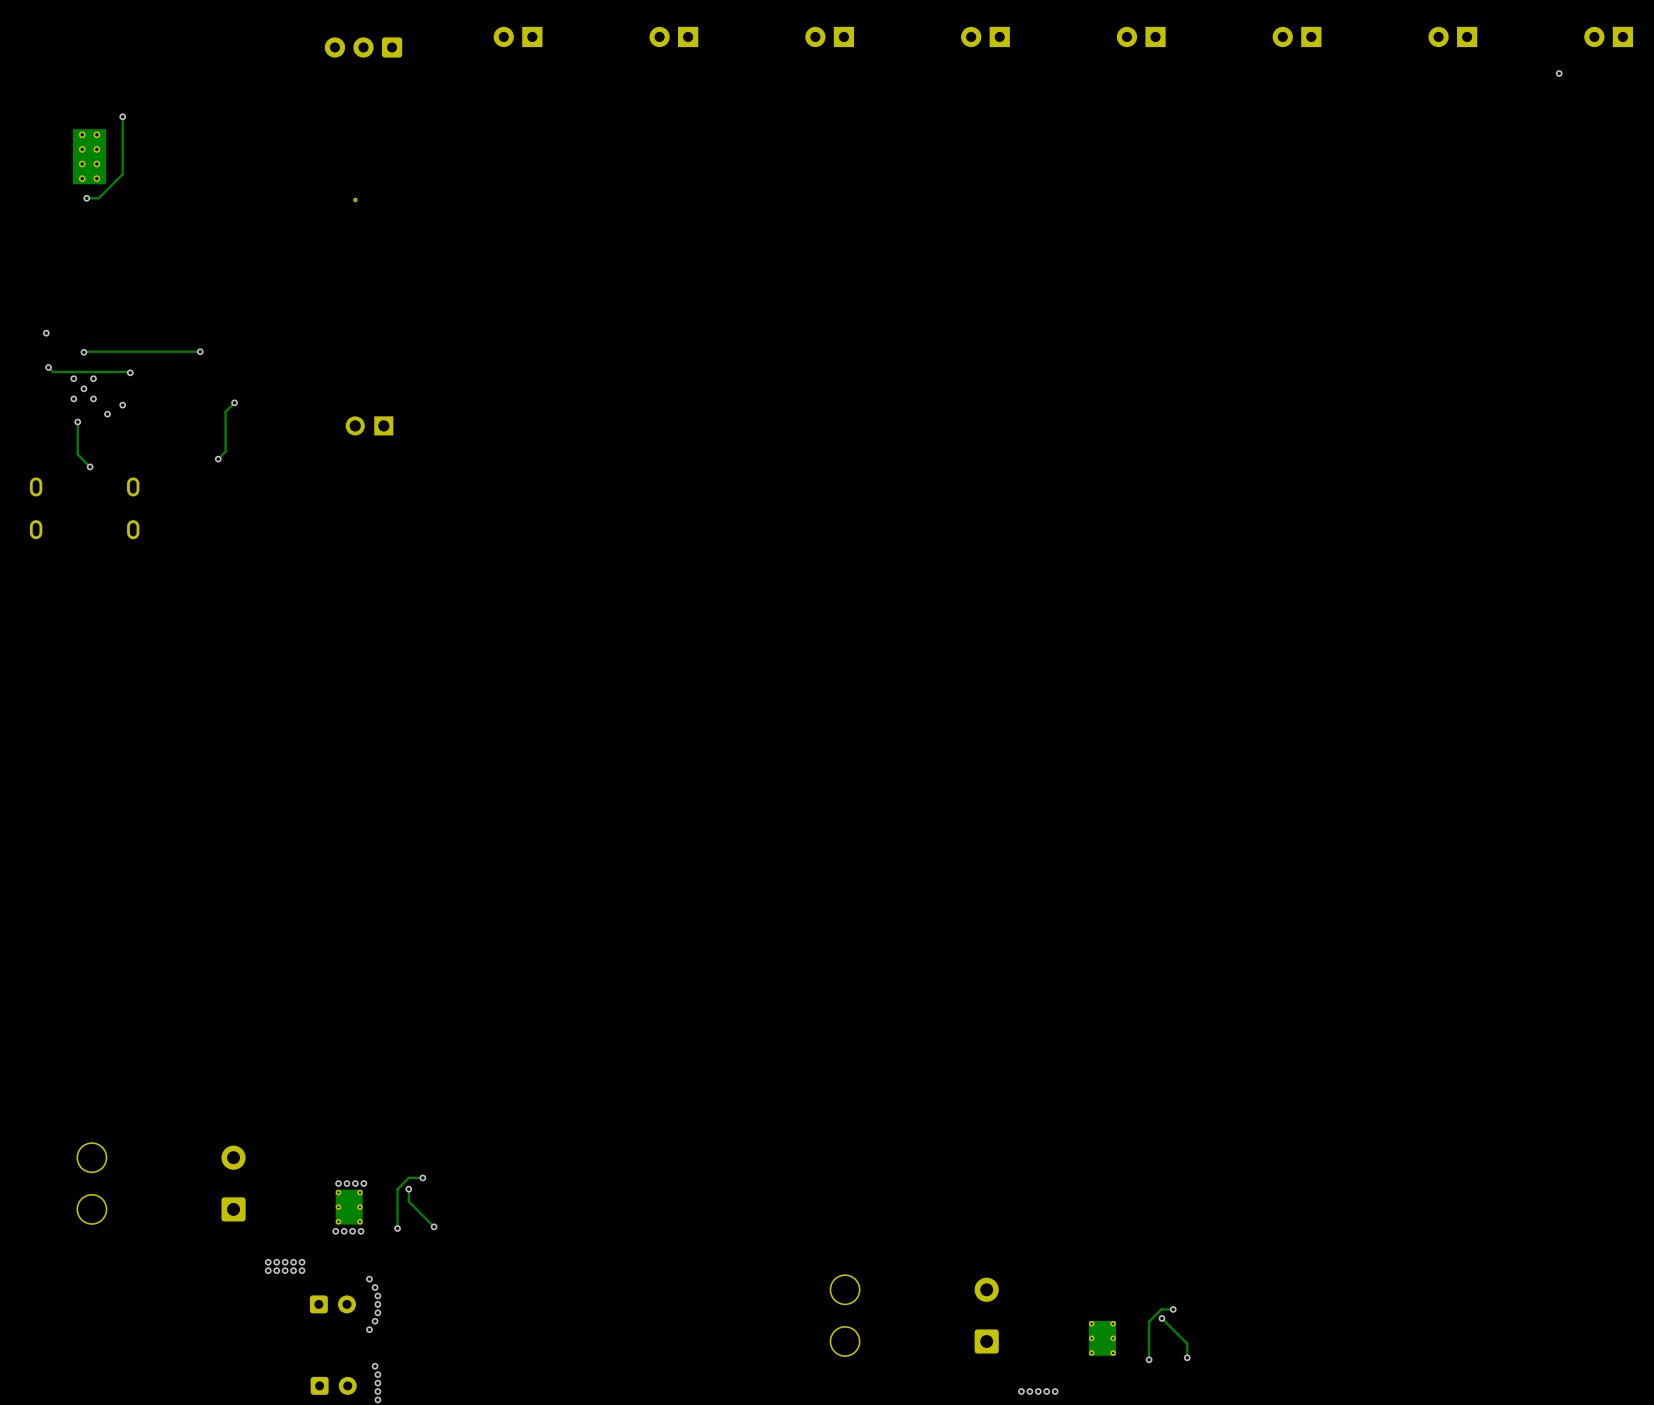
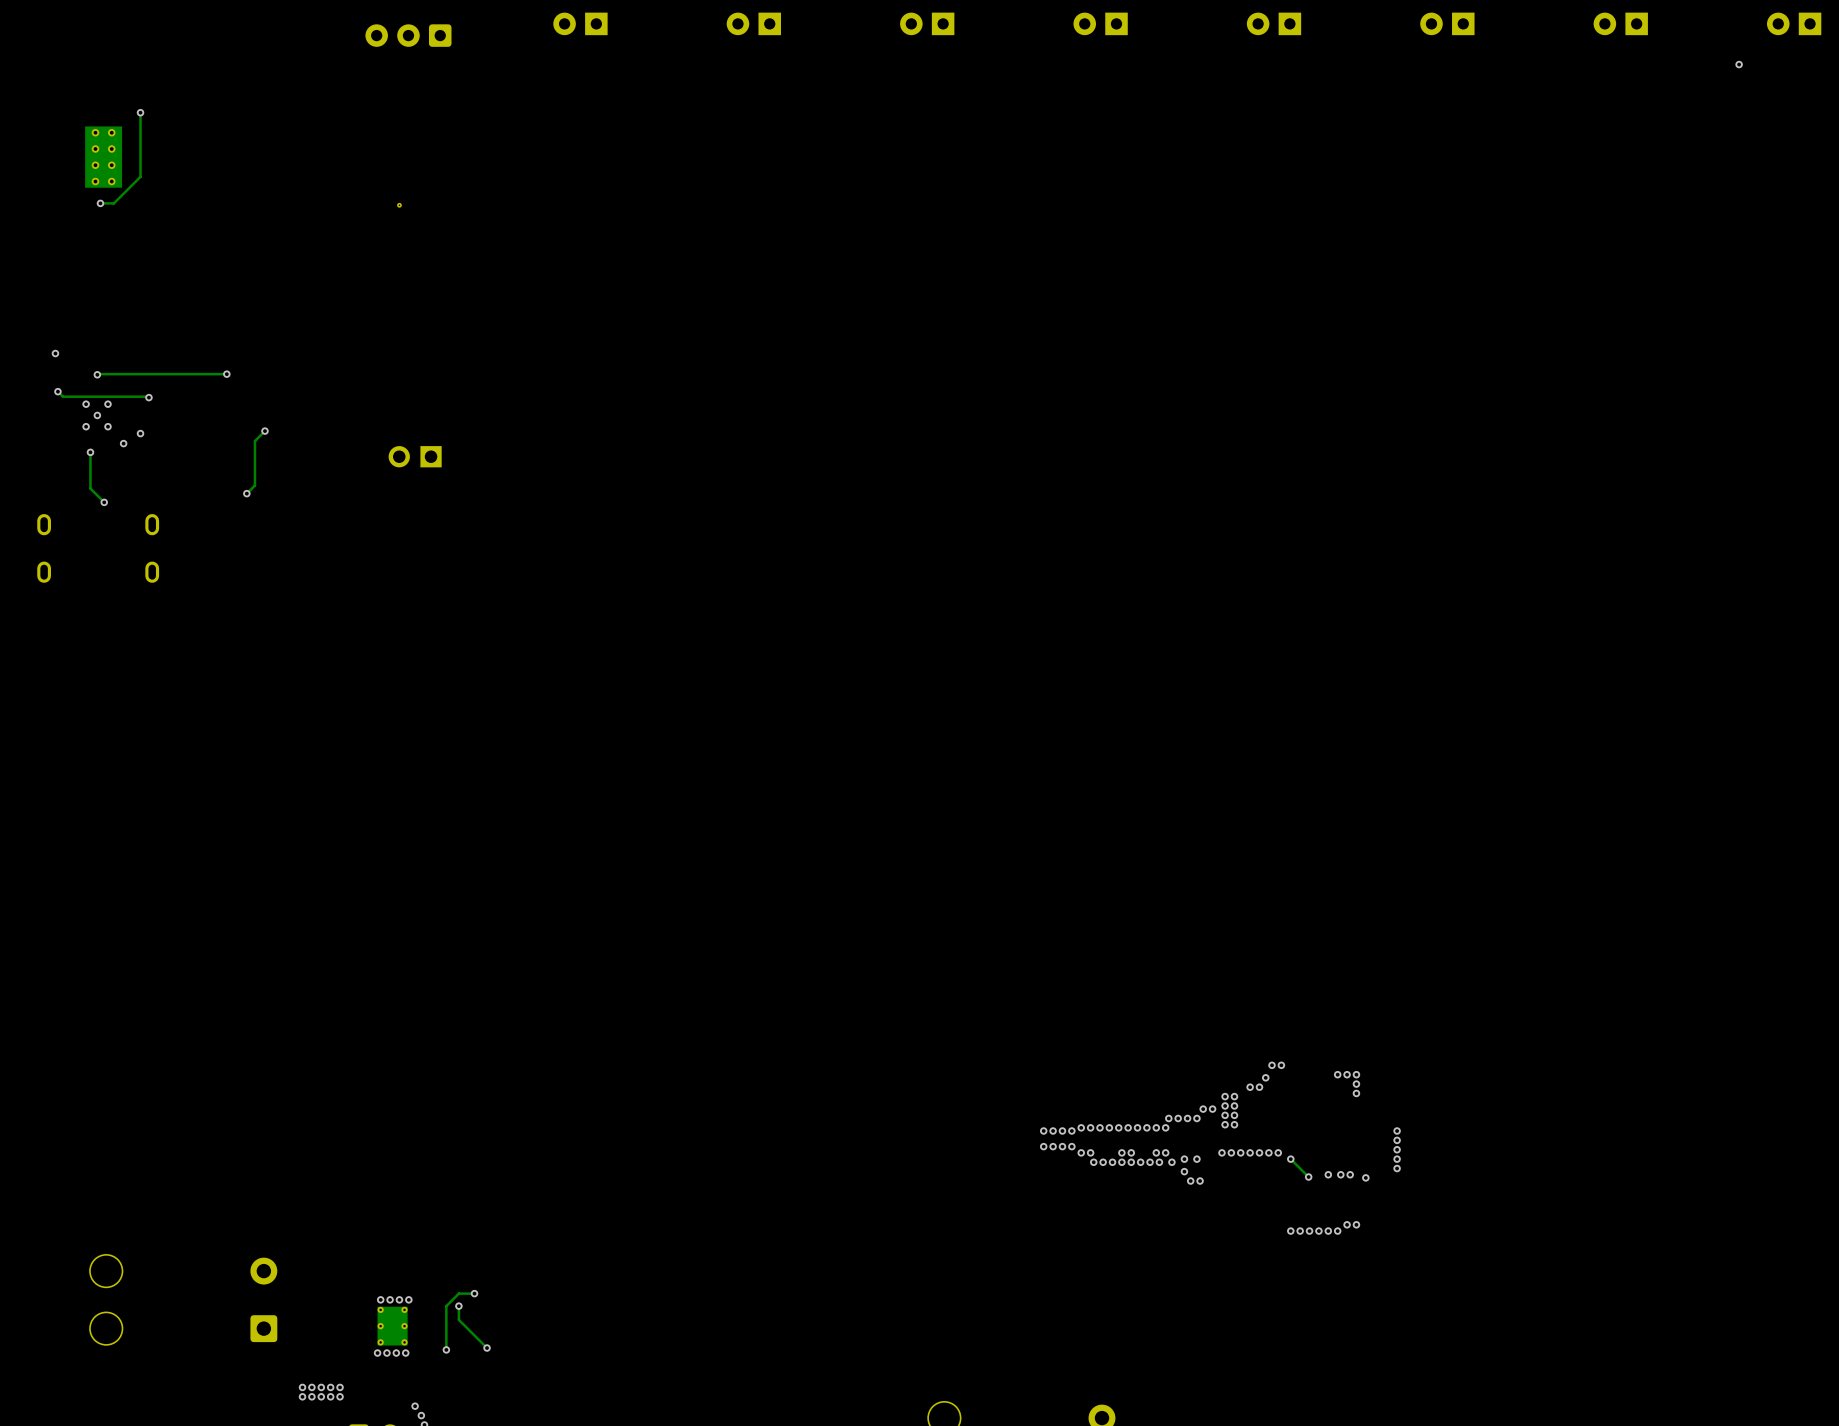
via: none -> (1272, 1065)
via: none -> (1281, 1065)
via: none -> (1337, 1074)
via: none -> (1347, 1074)
via: none -> (1356, 1074)
via: none -> (1265, 1077)
via: none -> (1356, 1084)
via: none -> (1250, 1087)
via: none -> (1259, 1087)
via: none -> (1356, 1093)
via: none -> (1225, 1096)
via: none -> (1234, 1096)
via: none -> (1225, 1105)
via: none -> (1234, 1105)
via: none -> (1203, 1109)
via: none -> (1212, 1109)
via: none -> (1225, 1115)
via: none -> (1234, 1115)
via: none -> (1168, 1118)
via: none -> (1178, 1118)
via: none -> (1187, 1118)
via: none -> (1196, 1118)
via: none -> (1225, 1124)
via: none -> (1234, 1124)
via: none -> (1081, 1127)
via: none -> (1090, 1127)
via: none -> (1100, 1127)
via: none -> (1109, 1127)
via: none -> (1118, 1127)
via: none -> (1128, 1127)
via: none -> (1137, 1127)
via: none -> (1146, 1127)
via: none -> (1156, 1127)
via: none -> (1165, 1127)
via: none -> (1043, 1130)
via: none -> (1053, 1130)
via: none -> (1062, 1130)
via: none -> (1071, 1130)
via: none -> (1397, 1130)
via: none -> (1397, 1140)
via: none -> (1043, 1146)
via: none -> (1053, 1146)
via: none -> (1062, 1146)
via: none -> (1071, 1146)
via: none -> (1397, 1149)
via: none -> (1081, 1152)
via: none -> (1090, 1152)
via: none -> (1121, 1152)
via: none -> (1131, 1152)
via: none -> (1156, 1152)
via: none -> (1165, 1152)
via: none -> (1221, 1152)
via: none -> (1231, 1152)
via: none -> (1240, 1152)
via: none -> (1250, 1152)
via: none -> (1259, 1152)
via: none -> (1268, 1152)
via: none -> (1278, 1152)
via: none -> (1184, 1159)
via: none -> (1196, 1159)
track: none -> (1290, 1159) (1308, 1177)
via: none -> (1290, 1159)
via: none -> (1397, 1159)
via: none -> (1093, 1162)
via: none -> (1103, 1162)
via: none -> (1112, 1162)
via: none -> (1121, 1162)
via: none -> (1131, 1162)
via: none -> (1140, 1162)
via: none -> (1150, 1162)
via: none -> (1159, 1162)
via: none -> (1171, 1162)
via: none -> (1397, 1168)
via: none -> (1184, 1171)
via: none -> (1328, 1174)
via: none -> (1340, 1174)
via: none -> (1350, 1174)
via: none -> (1308, 1177)
via: none -> (1365, 1177)
via: none -> (1190, 1181)
via: none -> (1200, 1181)
via: none -> (1347, 1224)
via: none -> (1356, 1224)
via: none -> (1290, 1231)
via: none -> (1300, 1231)
via: none -> (1309, 1231)
via: none -> (1318, 1231)
via: none -> (1328, 1231)
via: none -> (1337, 1231)

